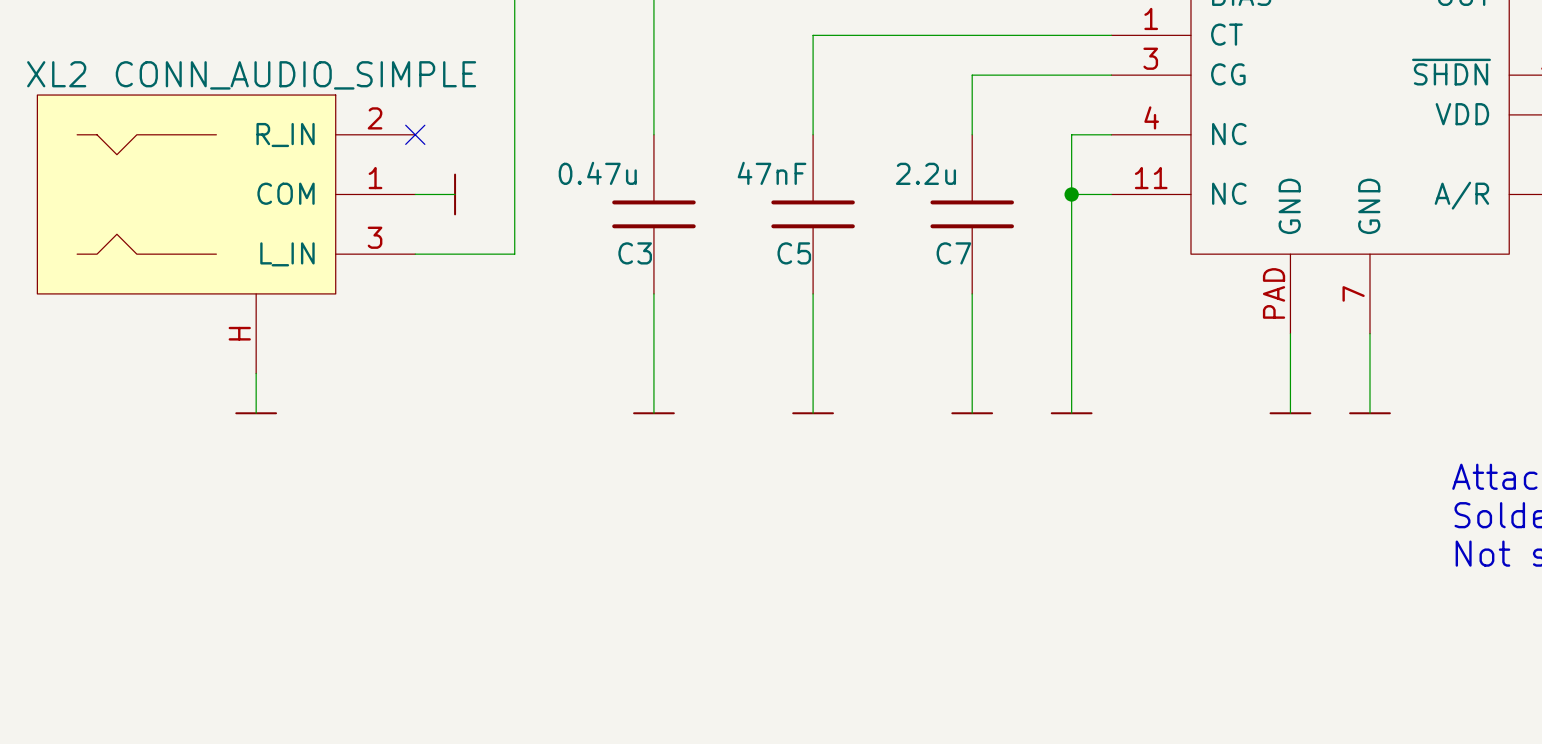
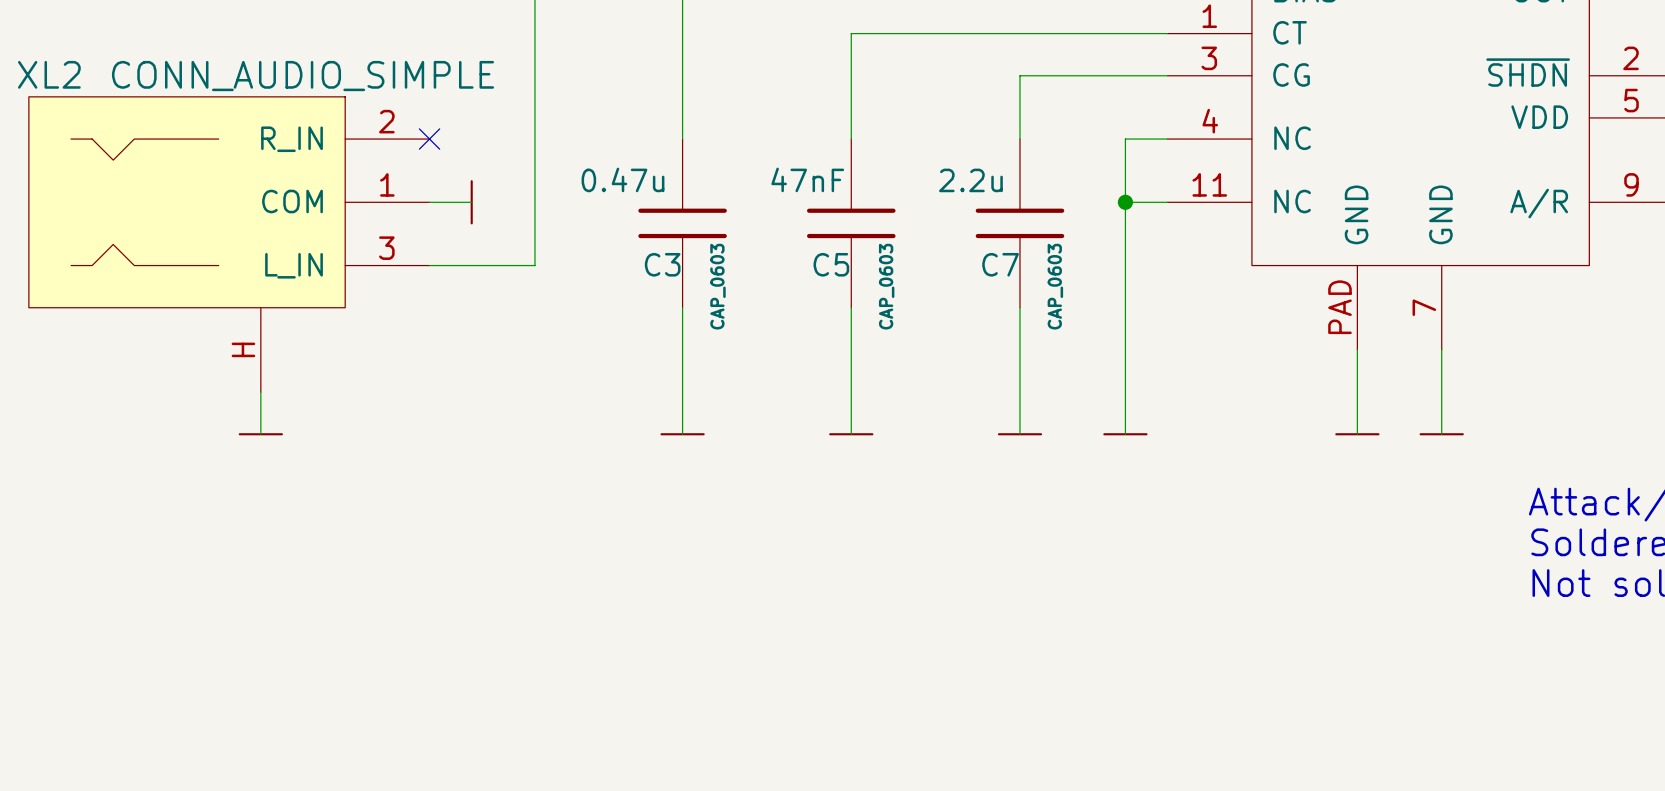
C3 text: none -> CAP_0603 (717, 286)
C5 text: none -> CAP_0603 (886, 286)
C7 text: none -> CAP_0603 (1055, 286)

